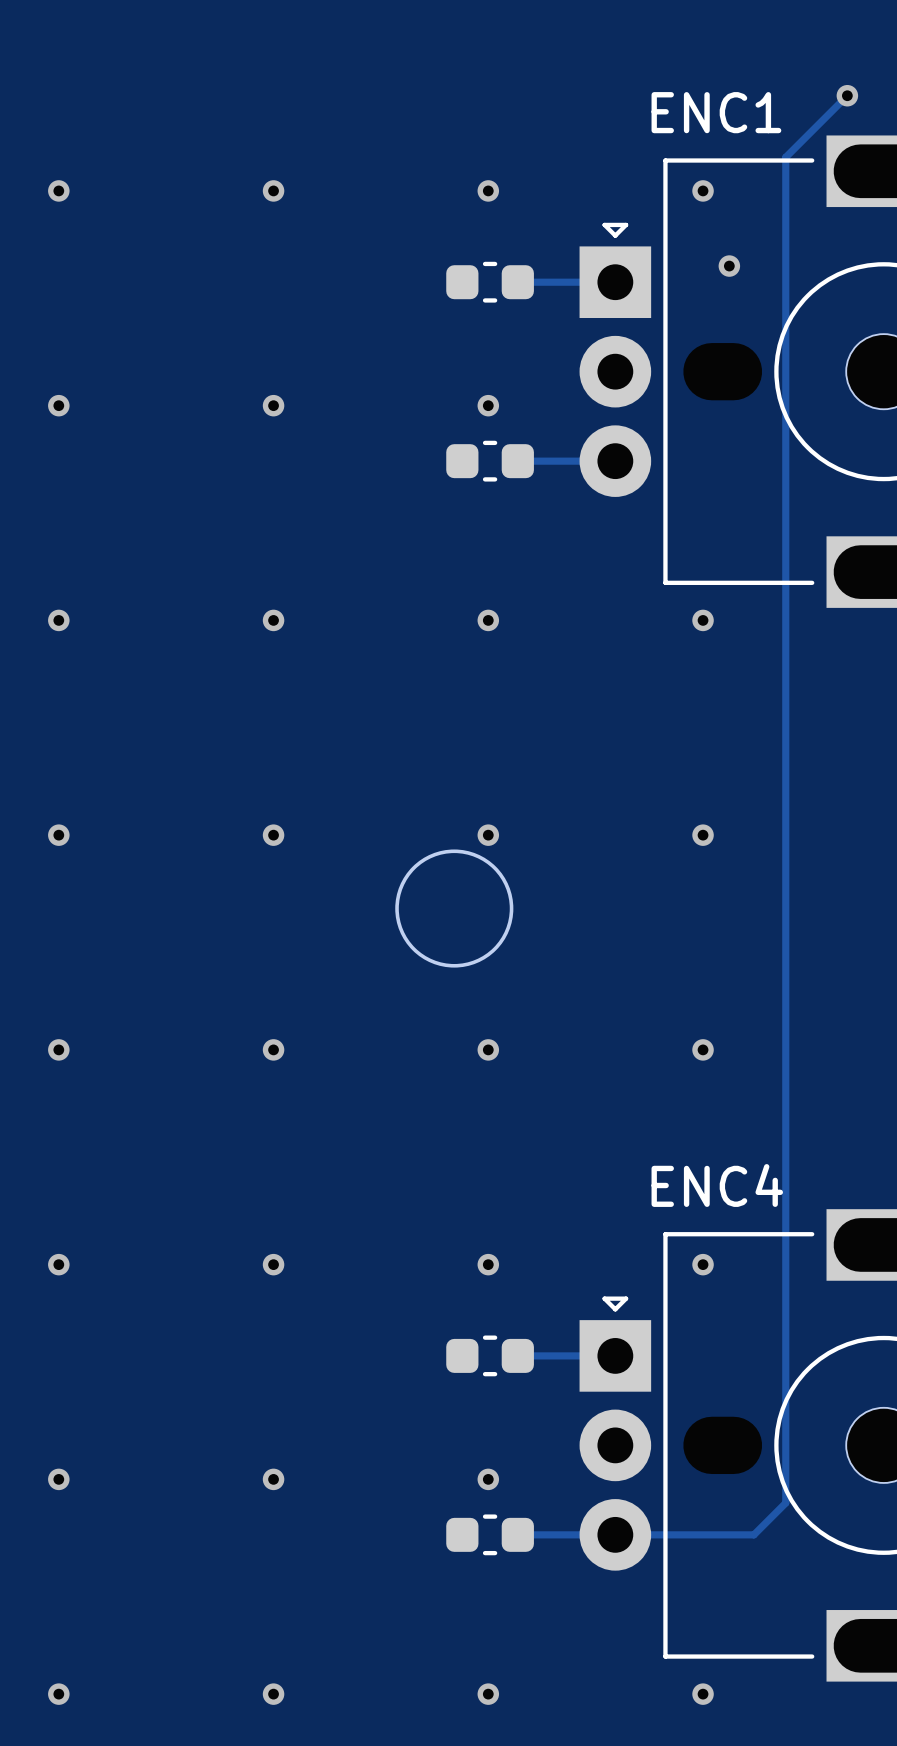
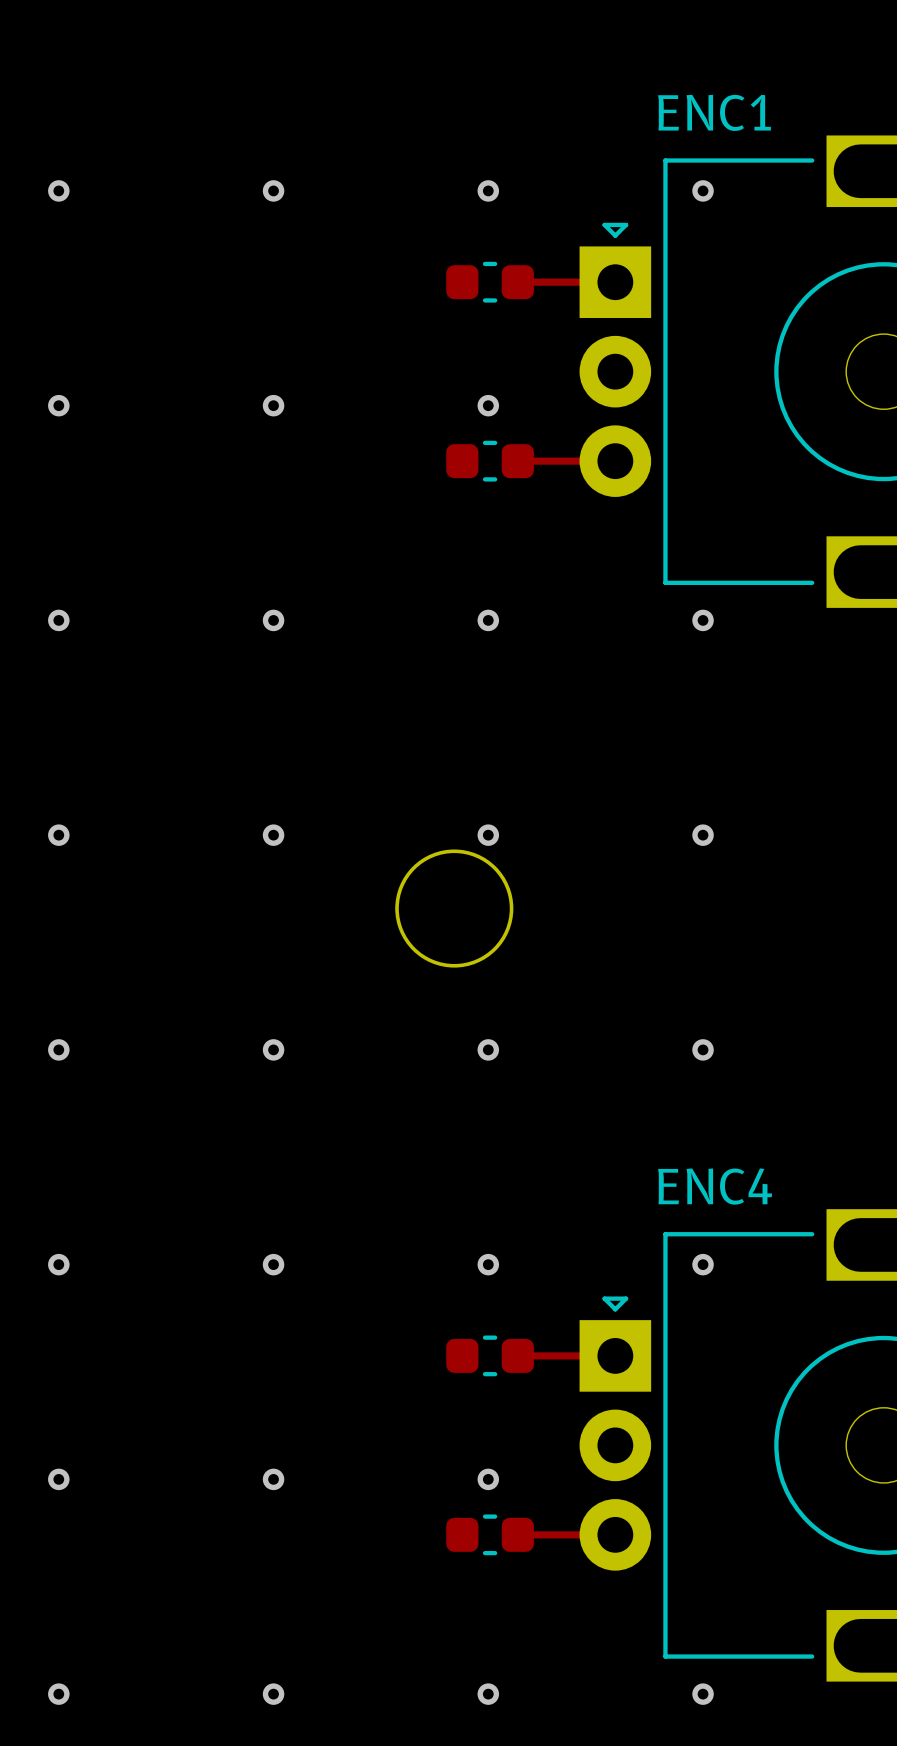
track: (847, 95) (785, 157) (785, 1503) (753, 1534) (615, 1534) -> none
via: (847, 95) -> none
via: (729, 266) -> none

